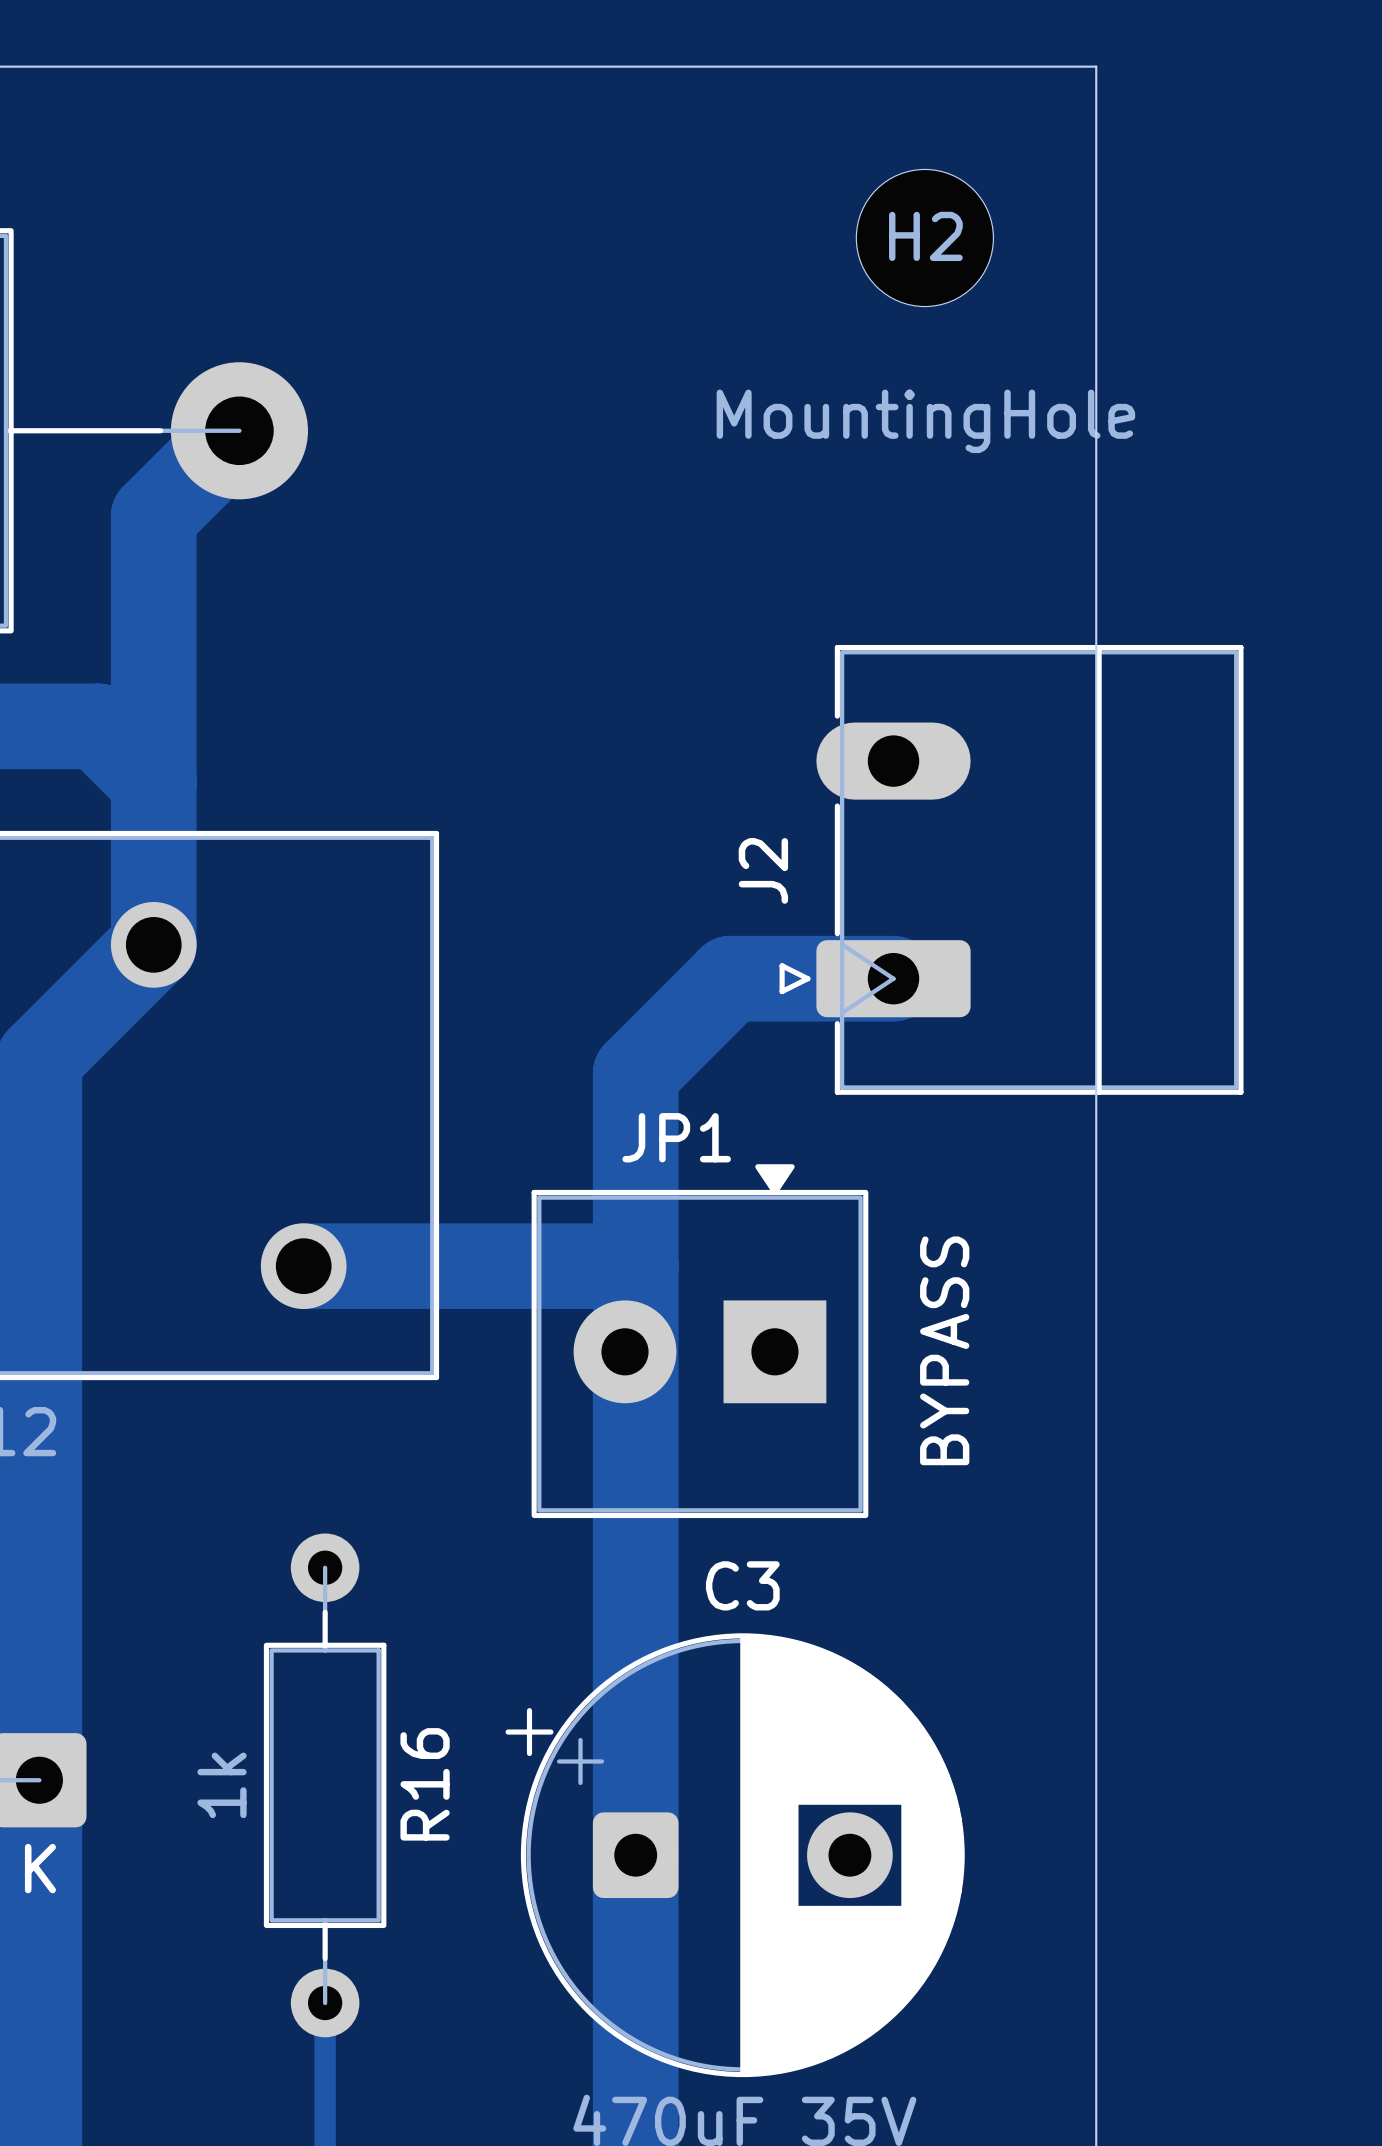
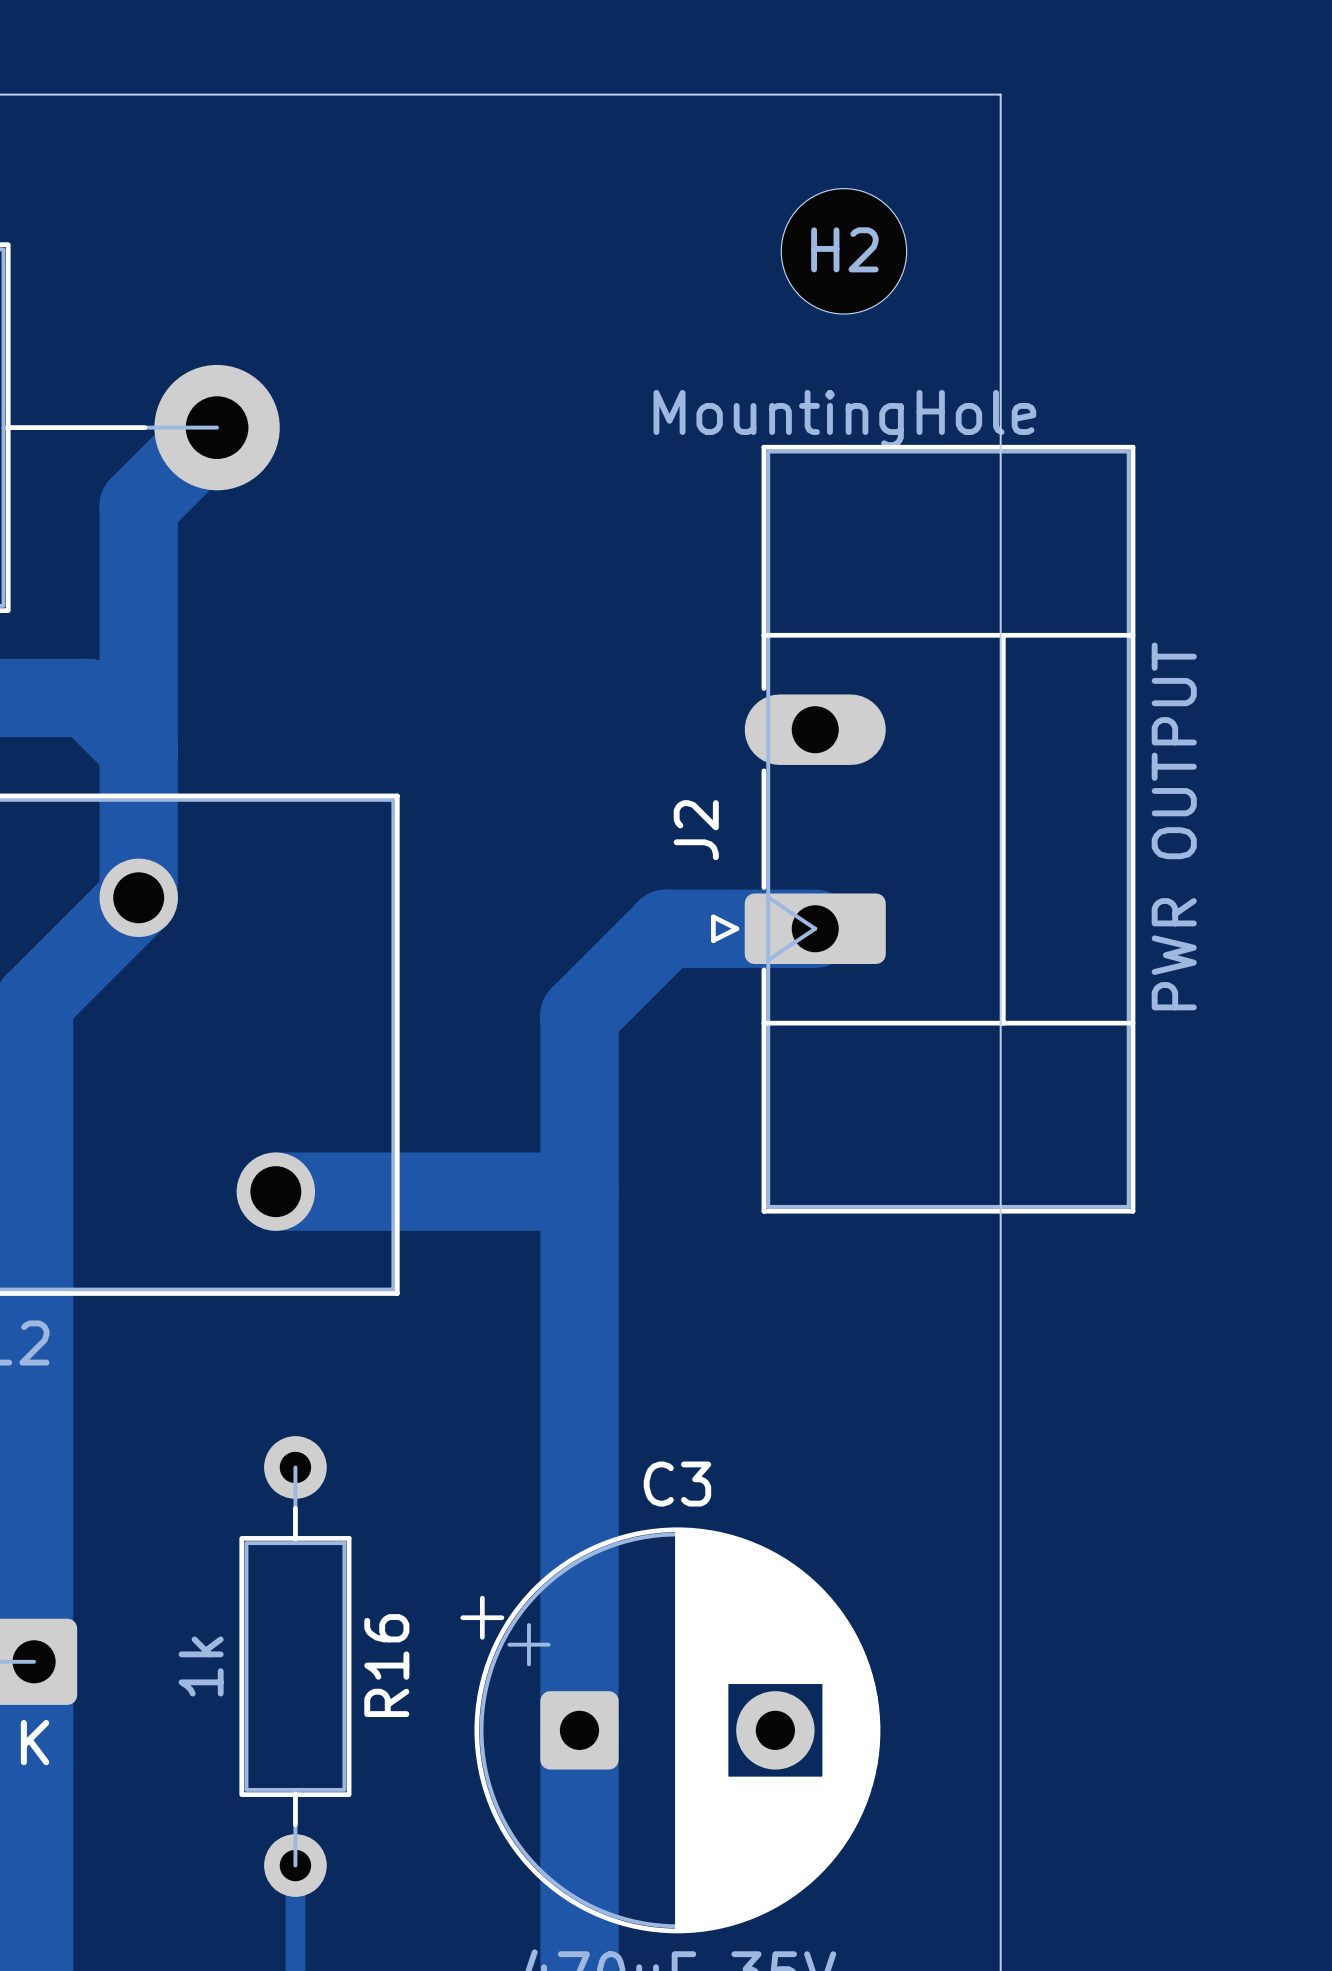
J2 footprint: [779, 644, 1244, 1095] -> [711, 444, 1136, 1214]
J2 value: none -> PWR OUTPUT (1174, 826)
JP1: (699, 1341) -> none
text: BYPASS (944, 1350) -> none

